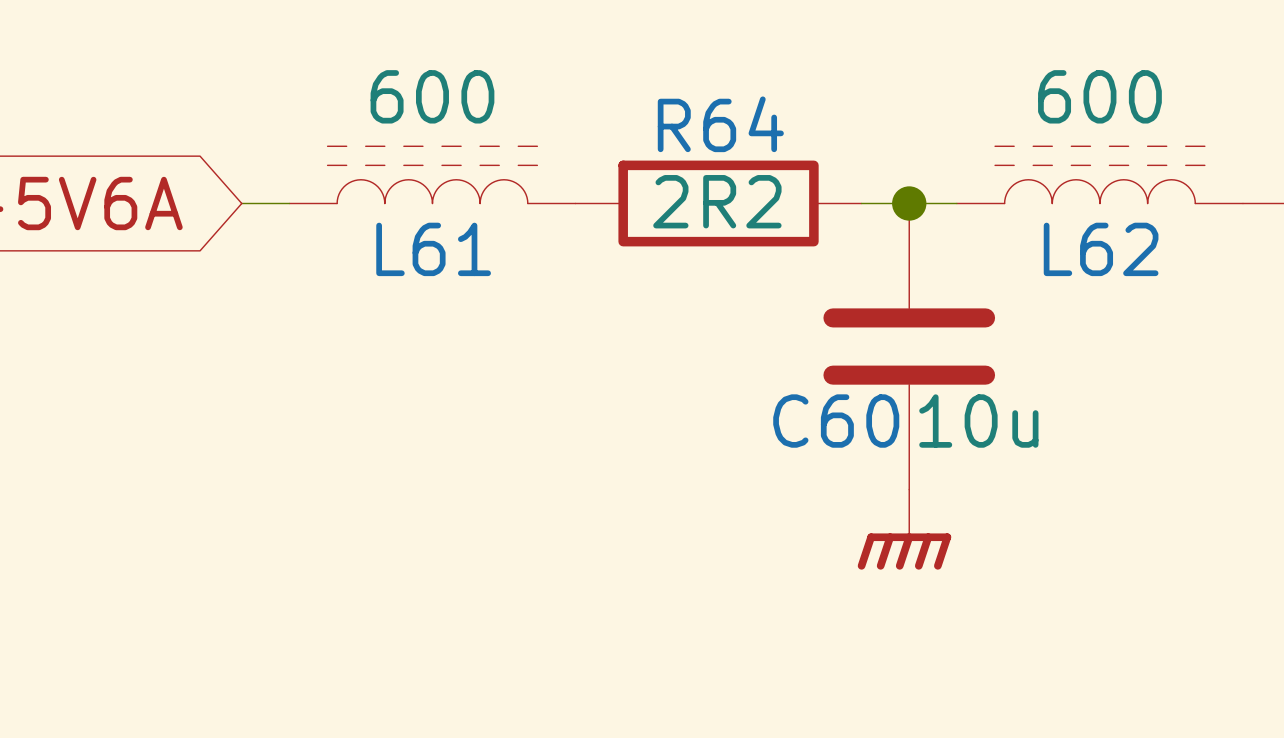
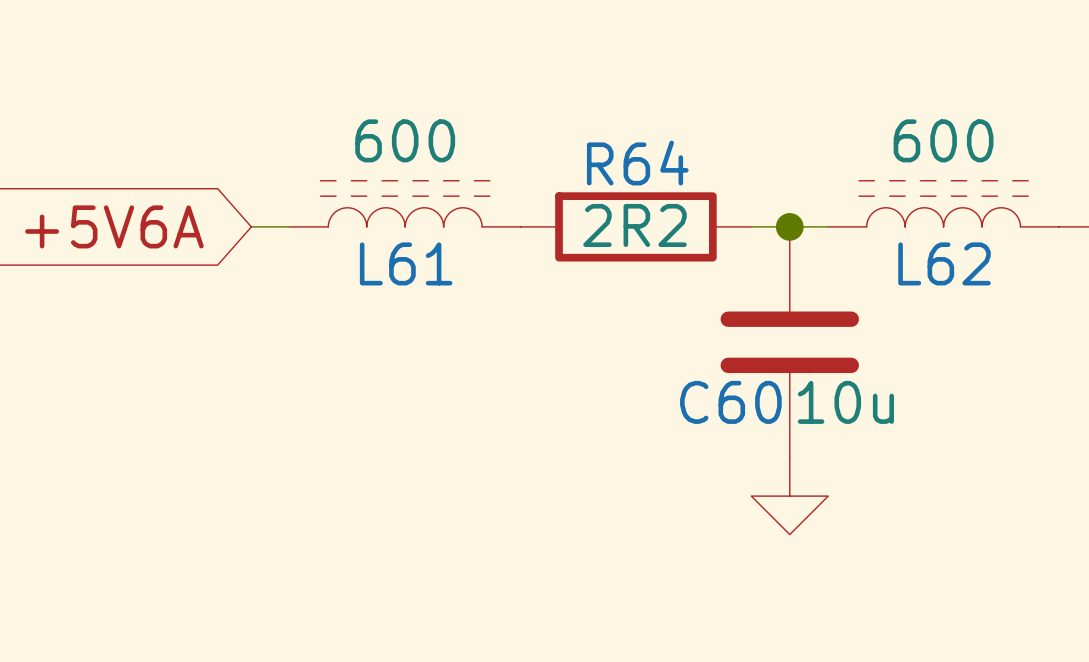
power symbol shape: [857, 489, 952, 570] -> [751, 457, 829, 535]

